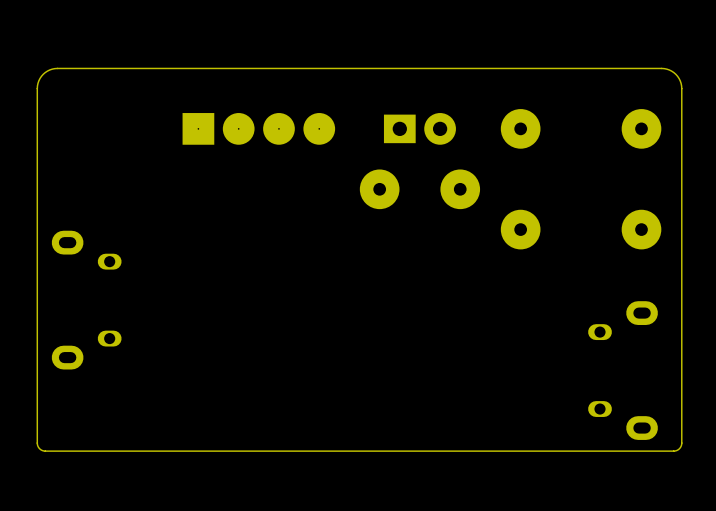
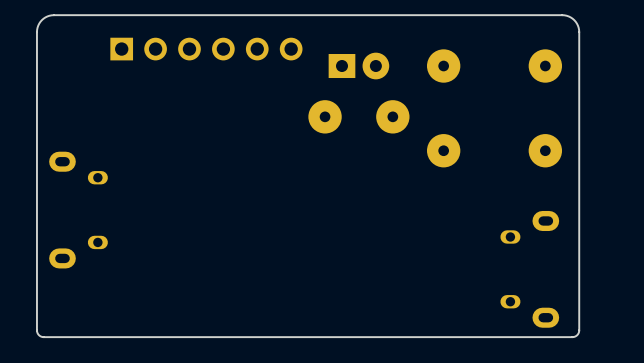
part: none -> (206, 49)
part: (258, 128) -> none

